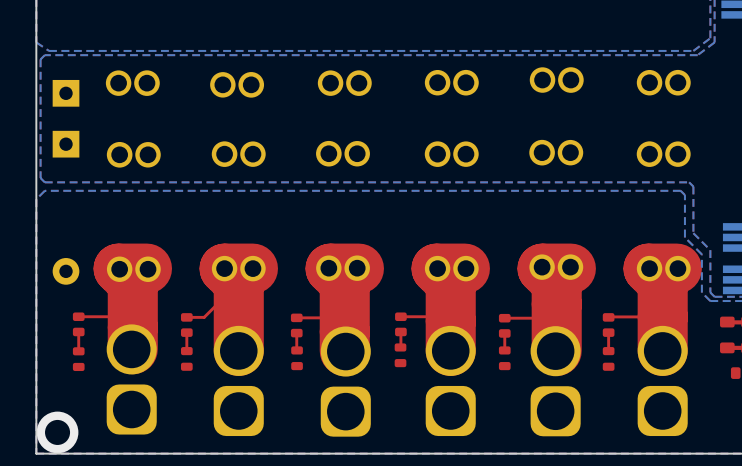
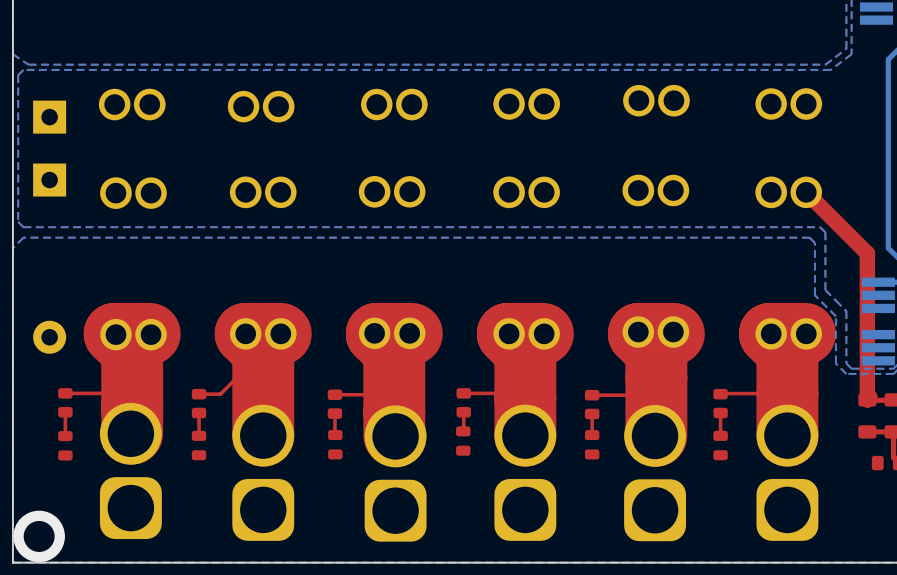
top track: none -> (806, 192) (867, 253) (867, 399) (869, 397)

